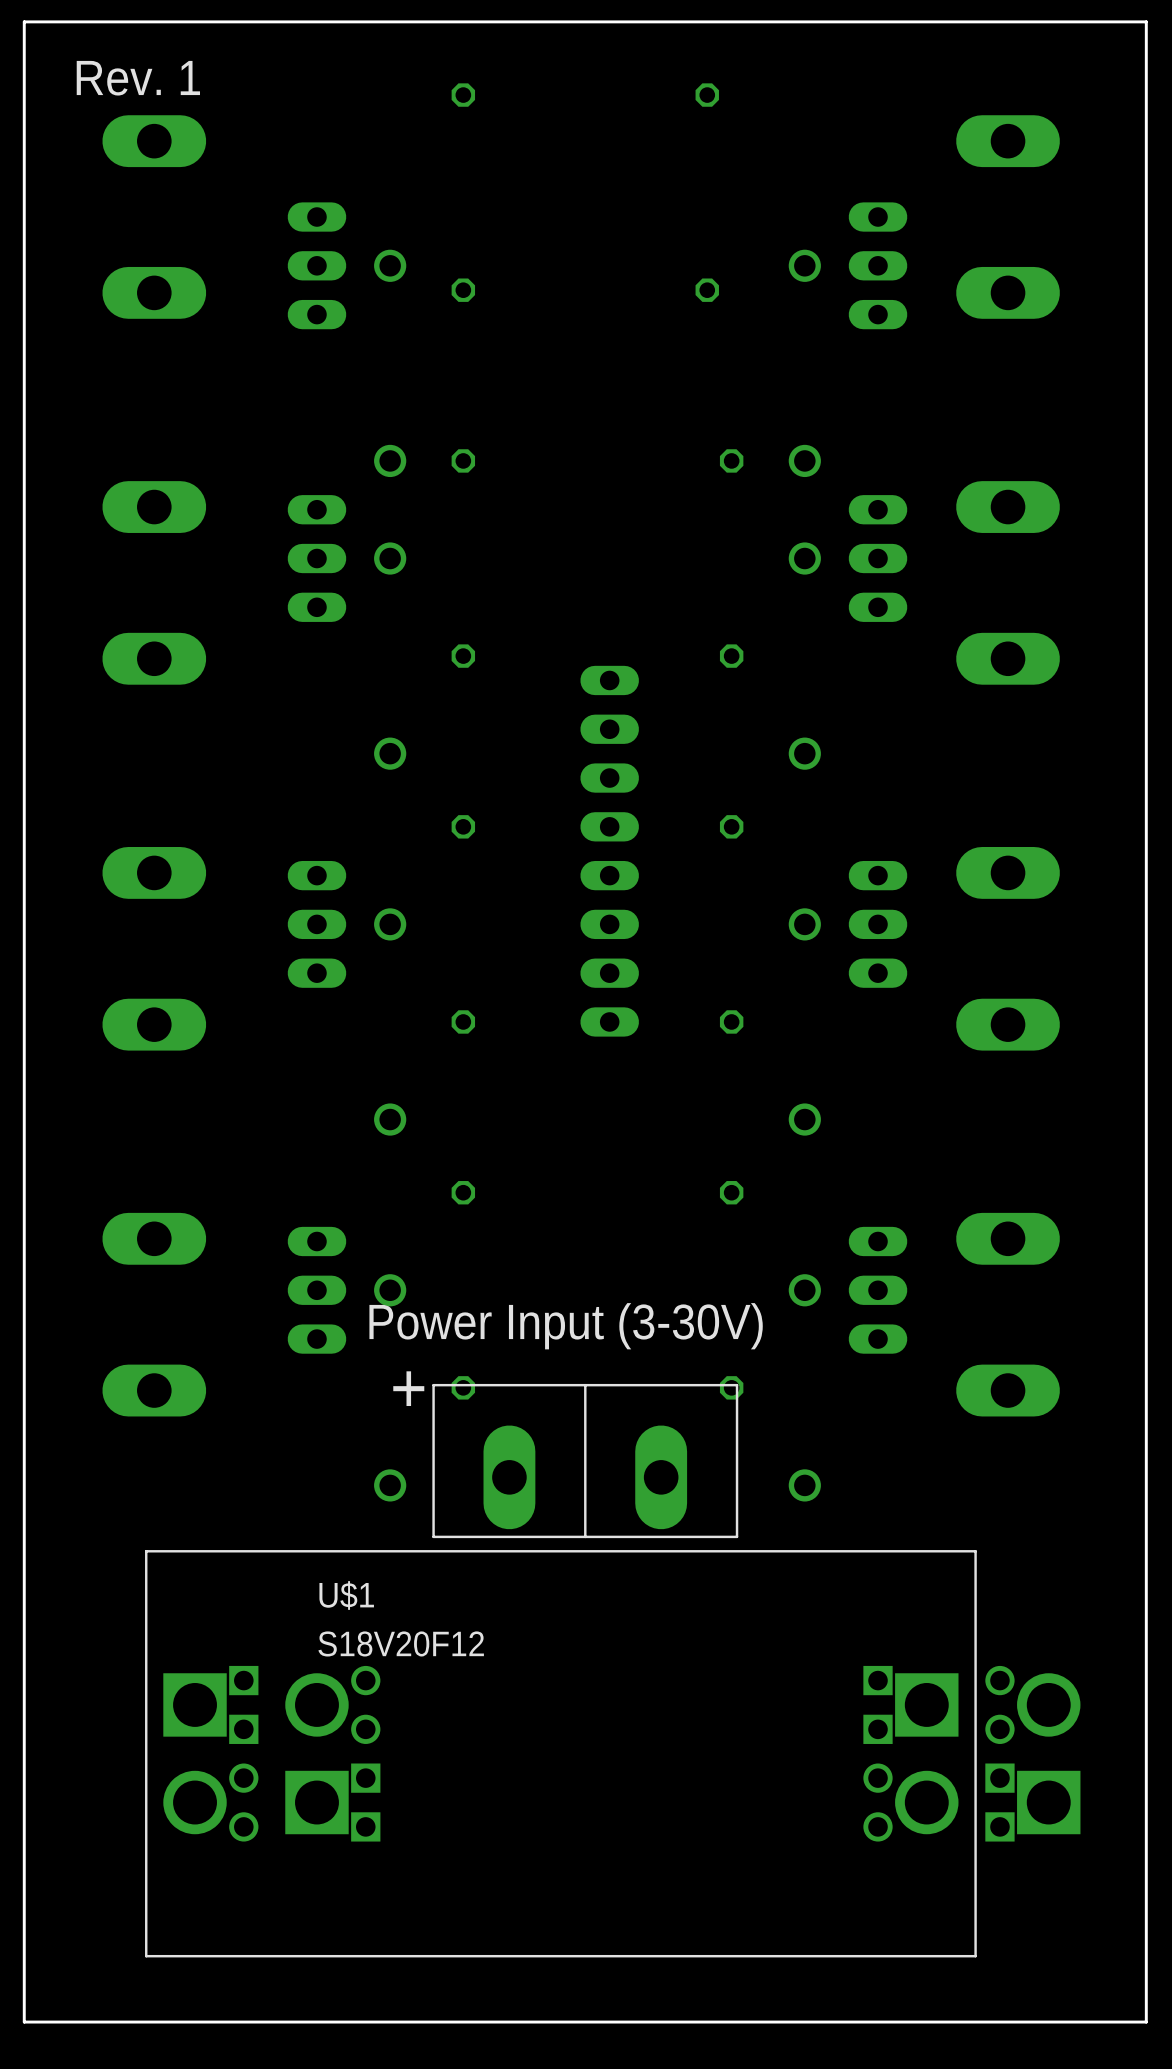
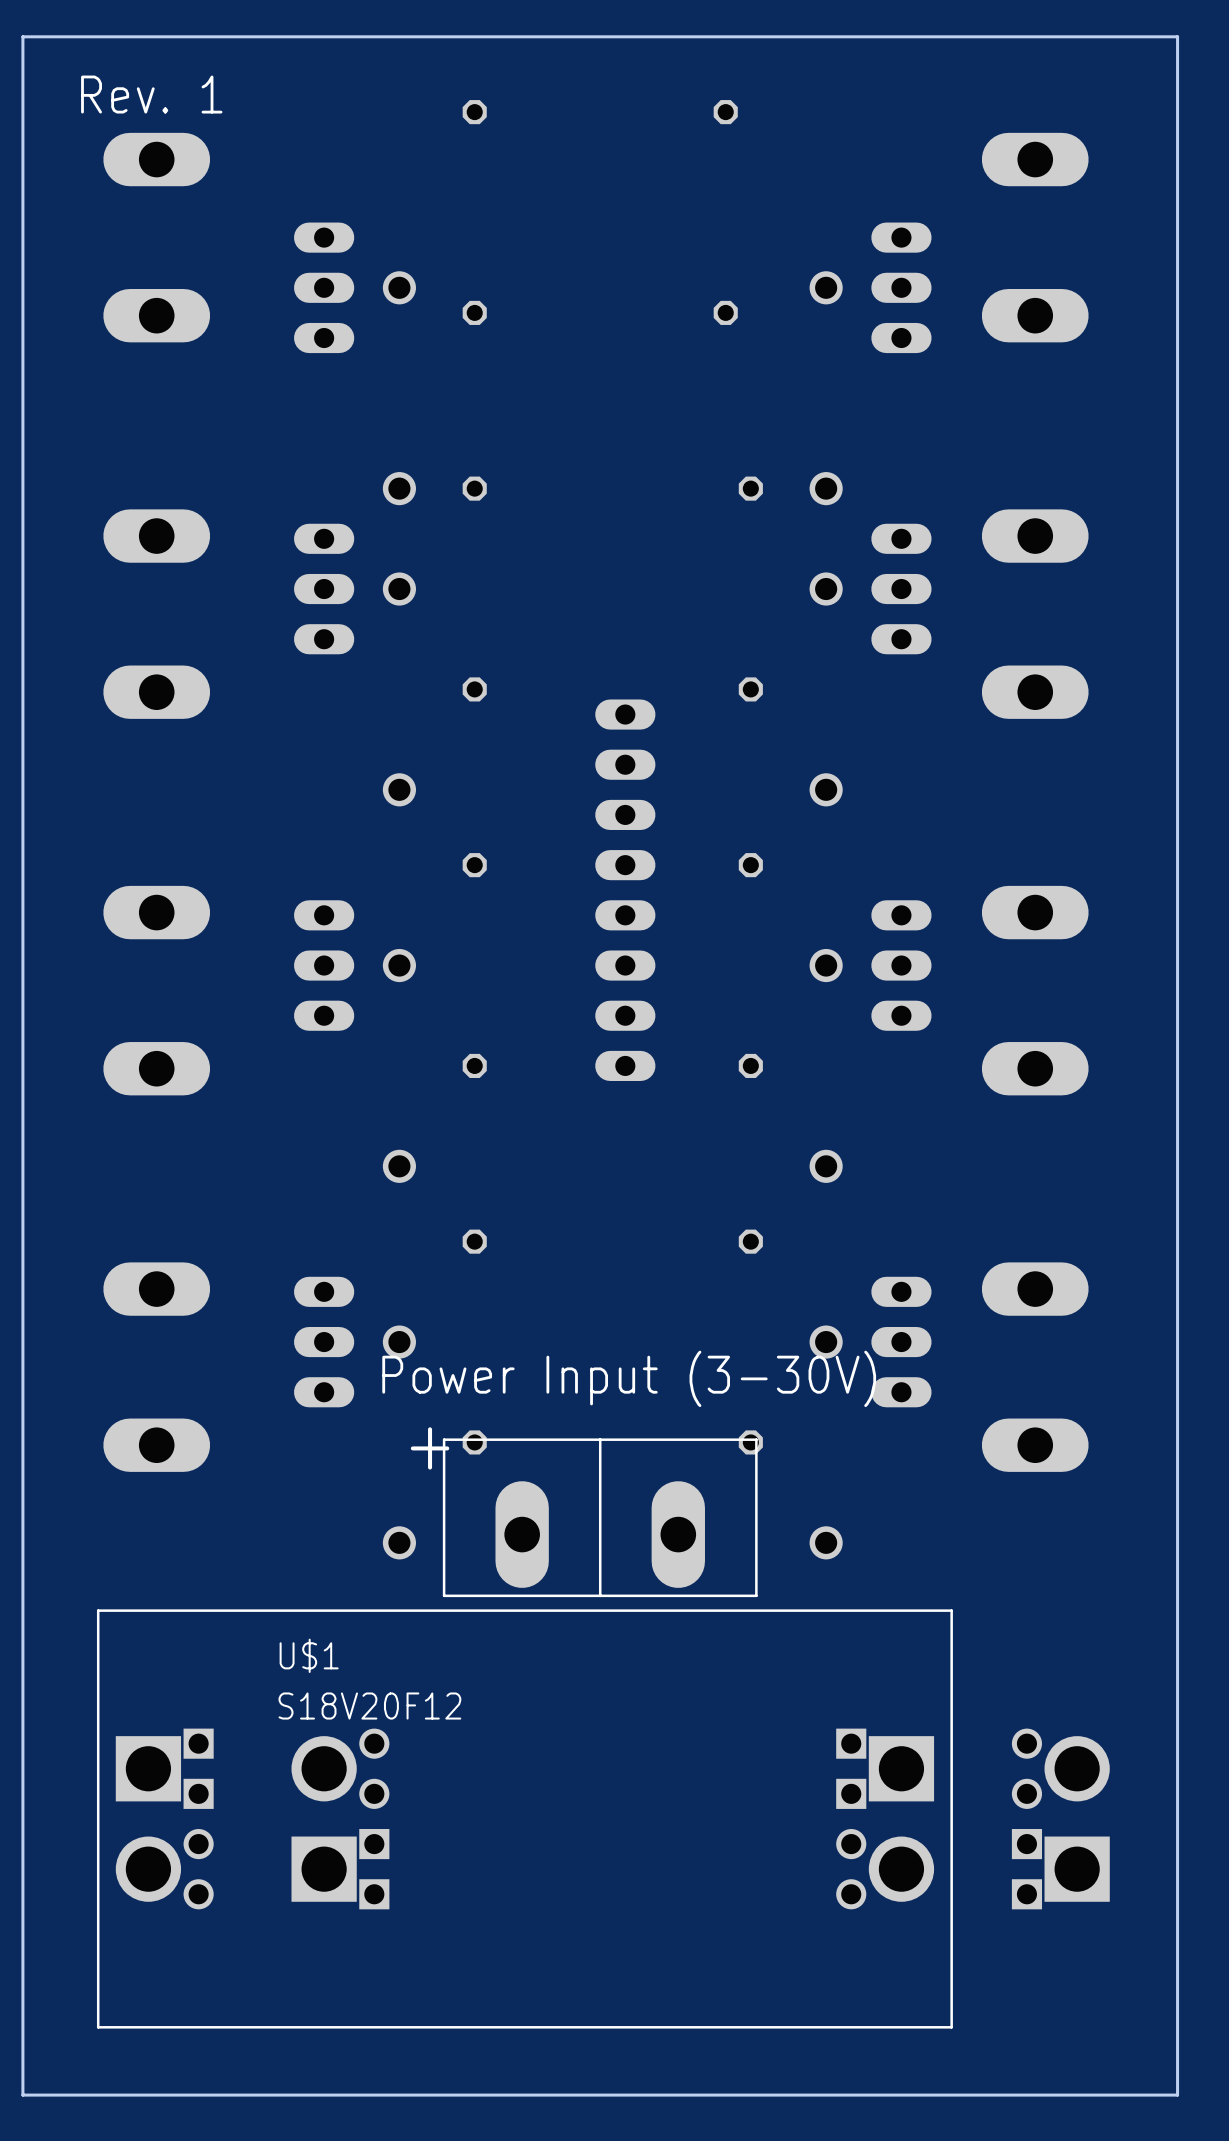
U$1 position: (560, 1753) -> (524, 1818)

